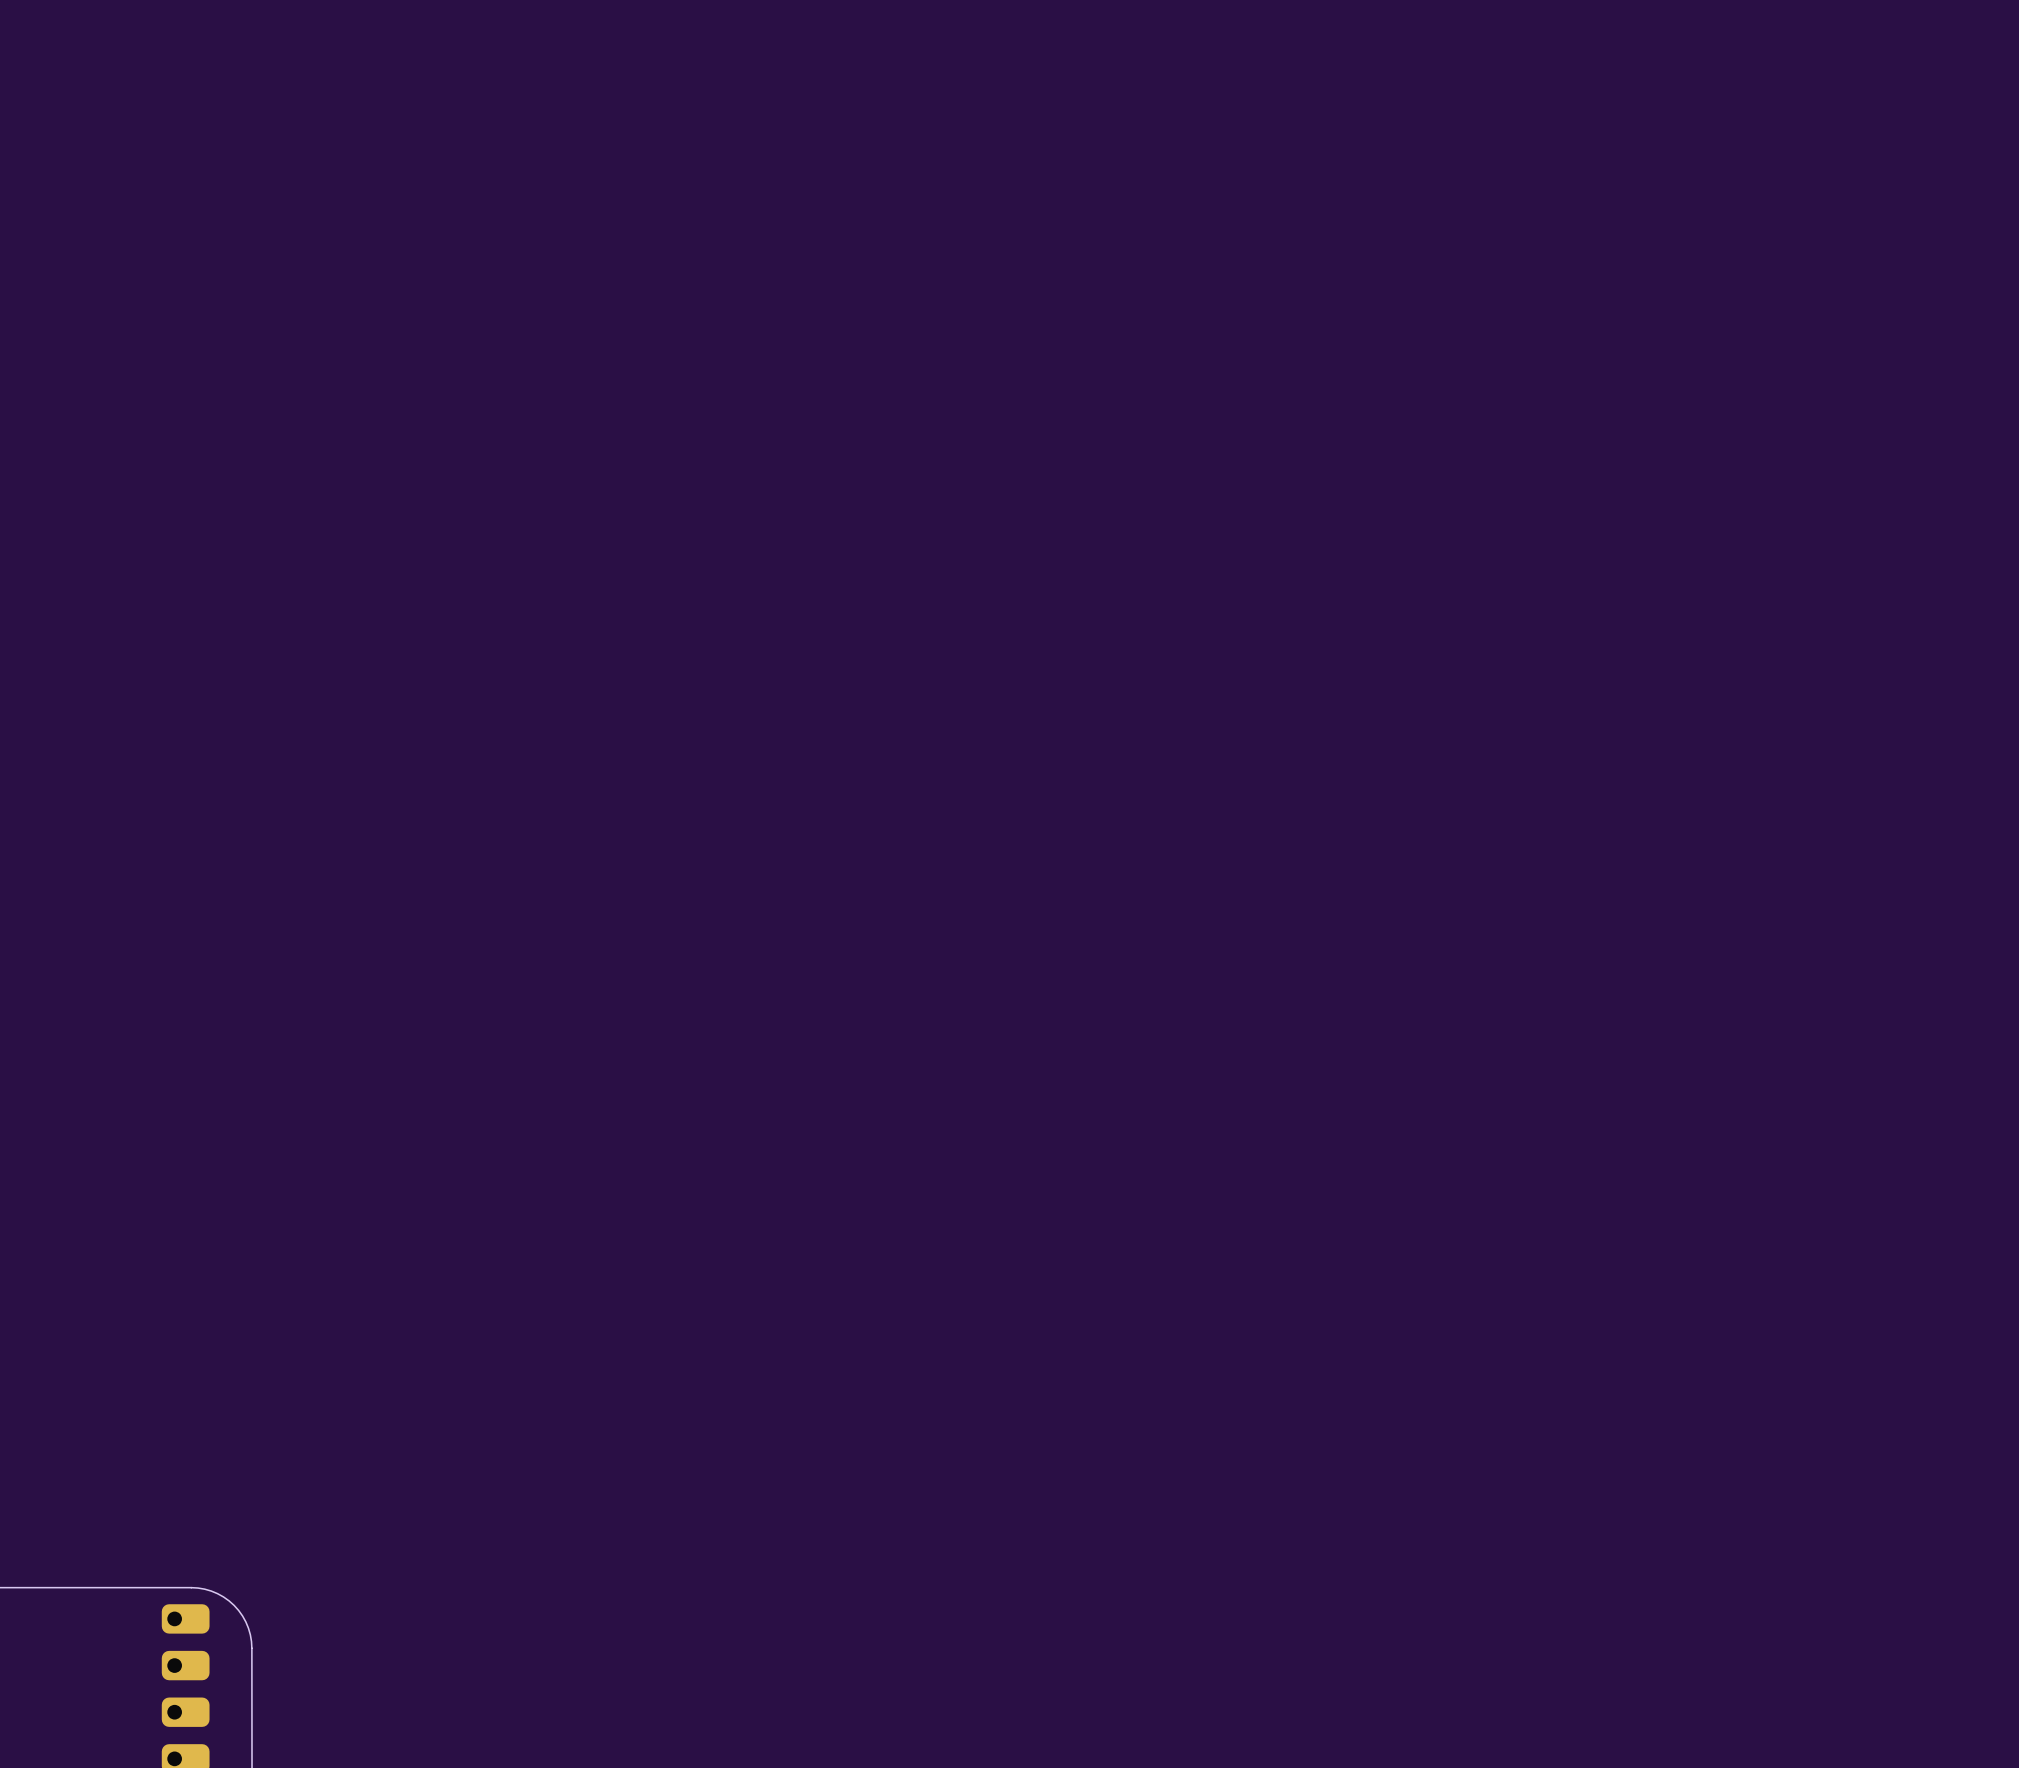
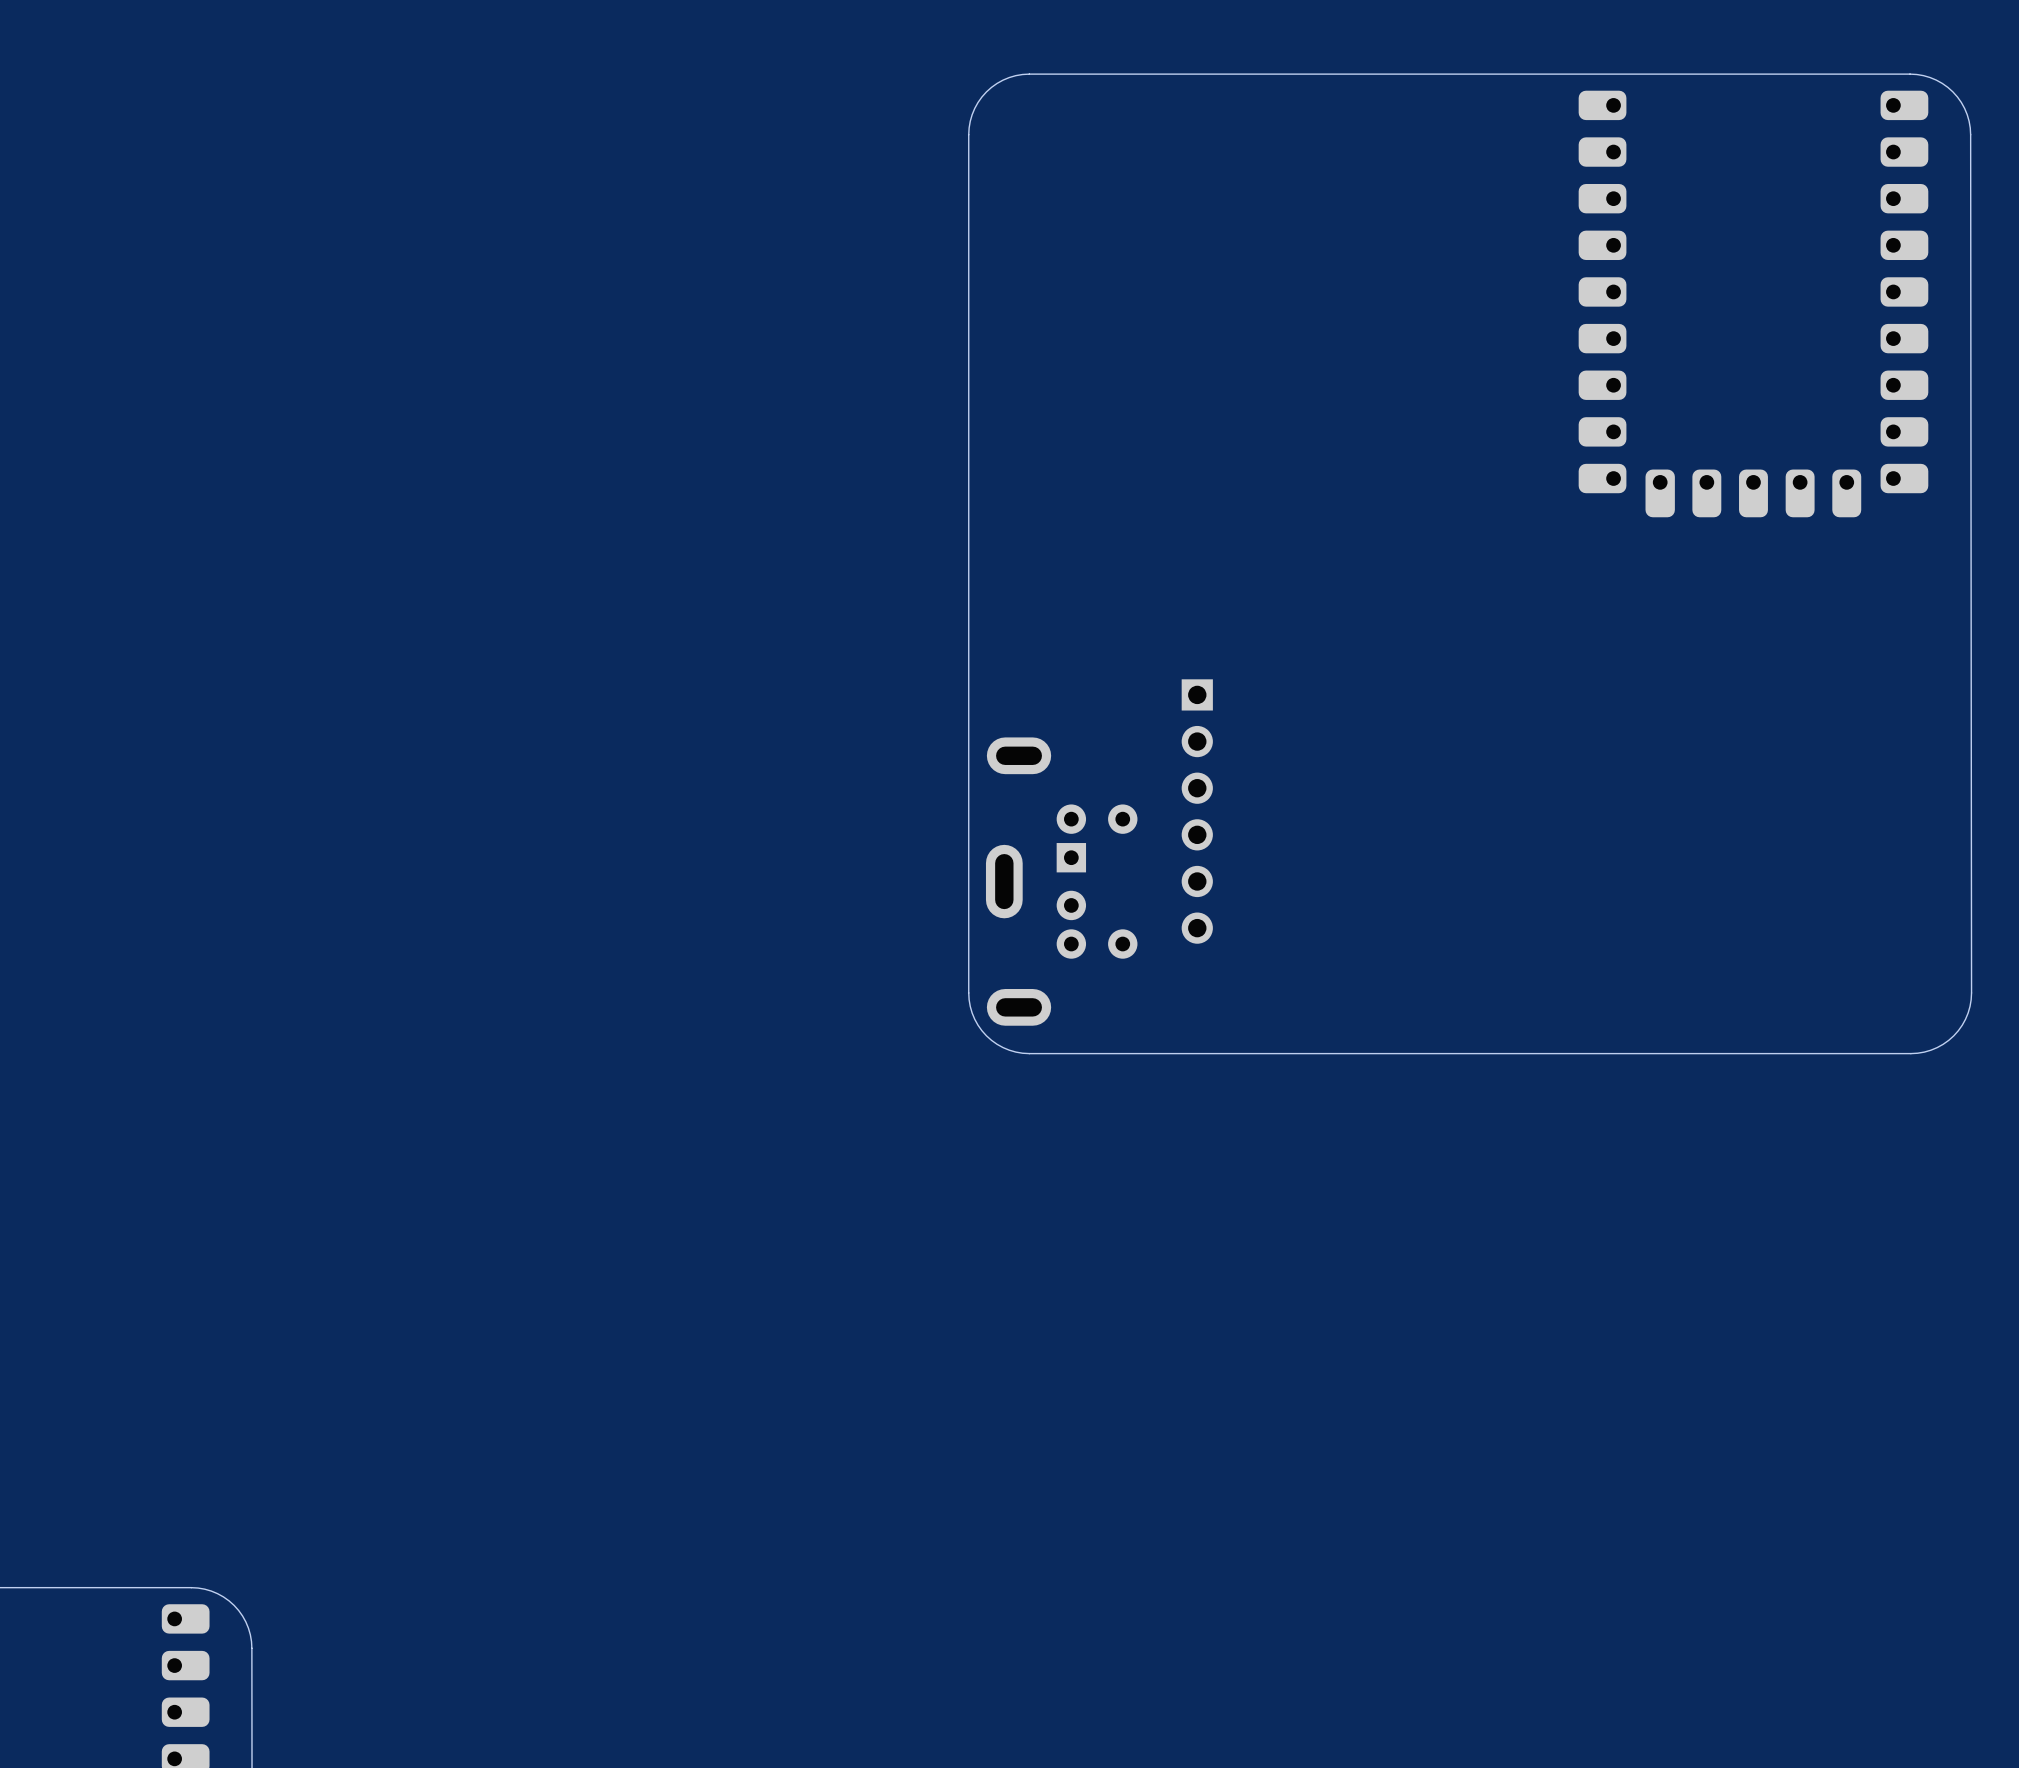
board edge: none -> (1910, 74) (1029, 74) (1009, 77) (997, 83) (986, 91) (978, 102) (972, 114) (968, 134) (968, 992) (972, 1012) (978, 1025) (986, 1035) (997, 1044) (1009, 1050) (1029, 1053) (1910, 1053) (1930, 1050) (1943, 1044) (1953, 1035) (1962, 1025) (1968, 1012) (1971, 992) (1970, 134) (1967, 114) (1961, 102) (1952, 91) (1942, 83) (1930, 77) (1910, 74)
part: none -> (1753, 303)
part: none -> (1197, 811)
part: none -> (1061, 881)

